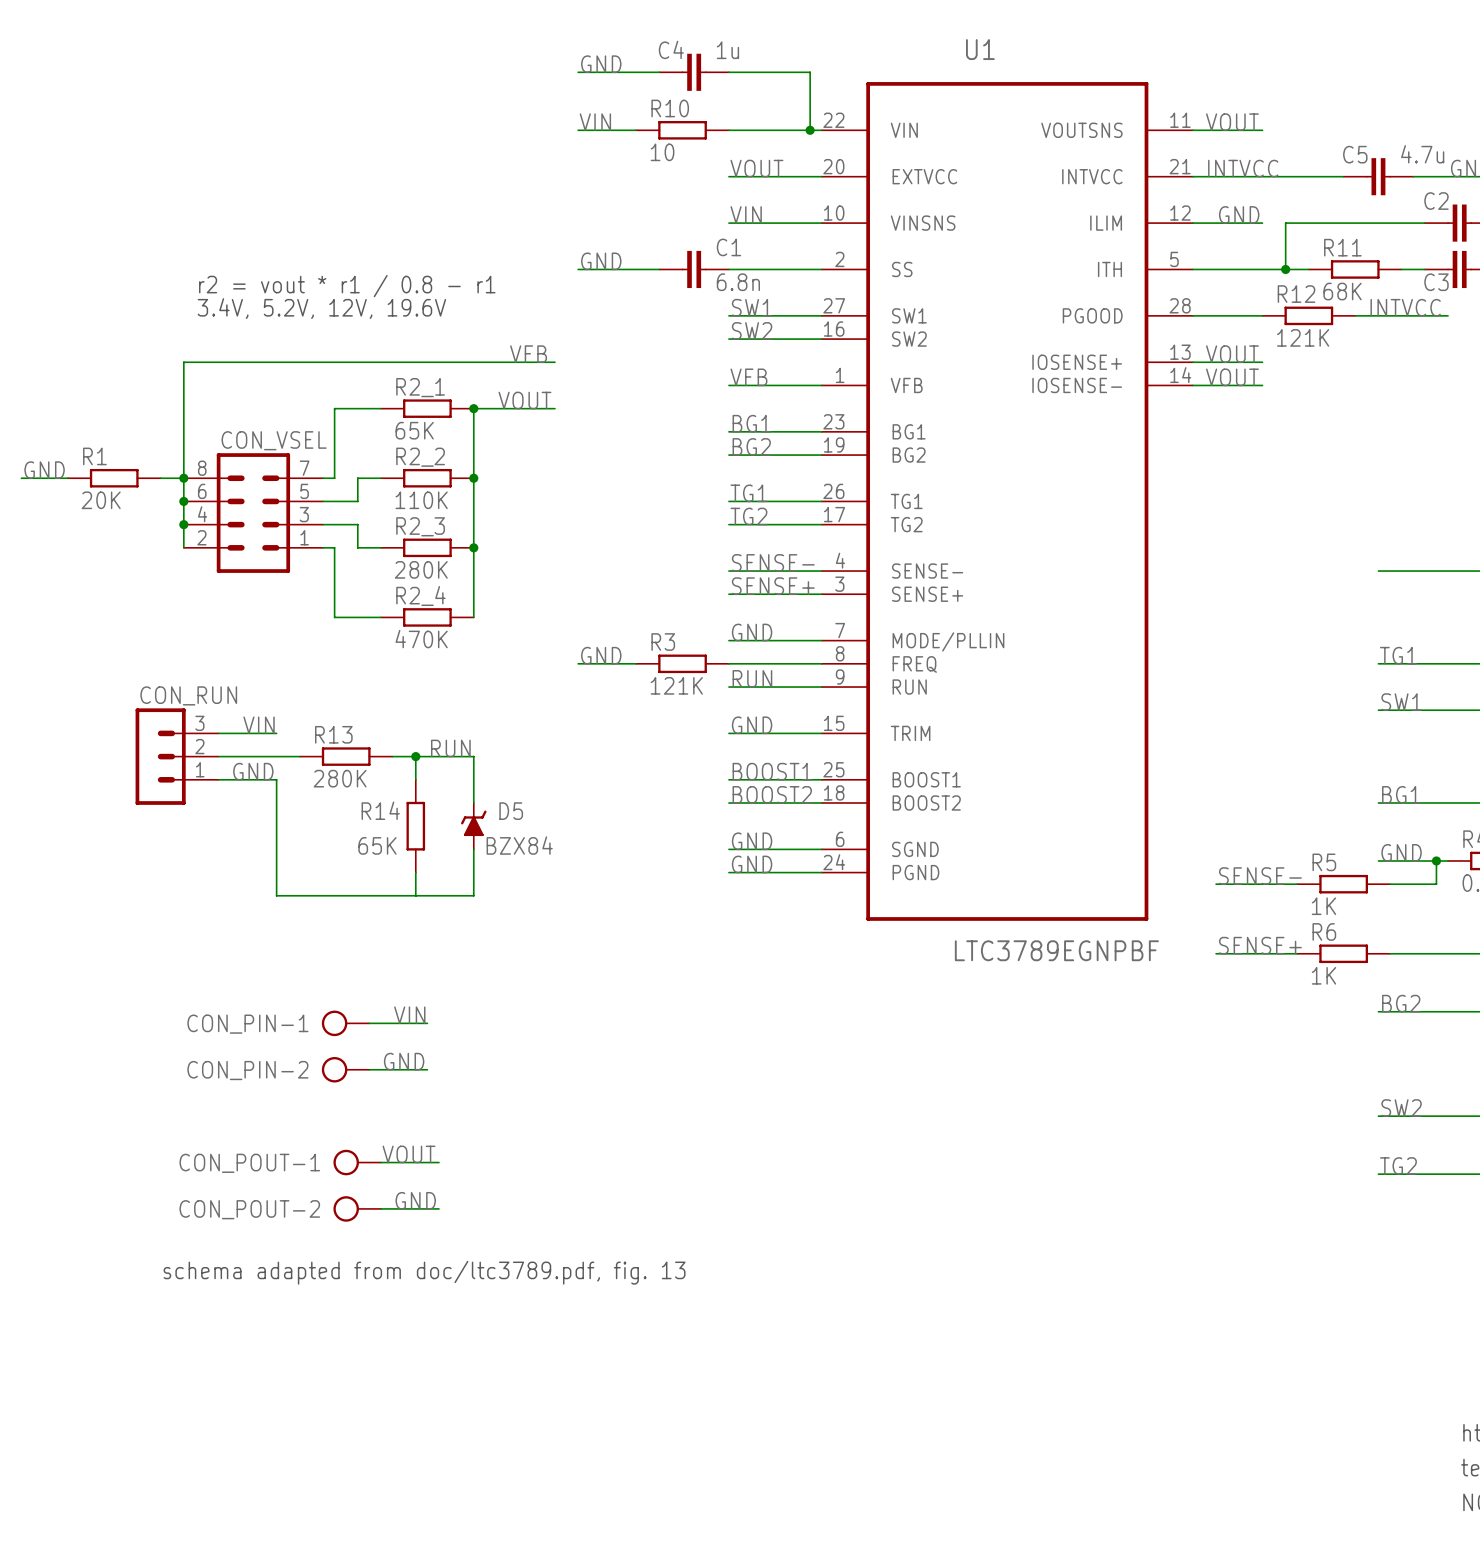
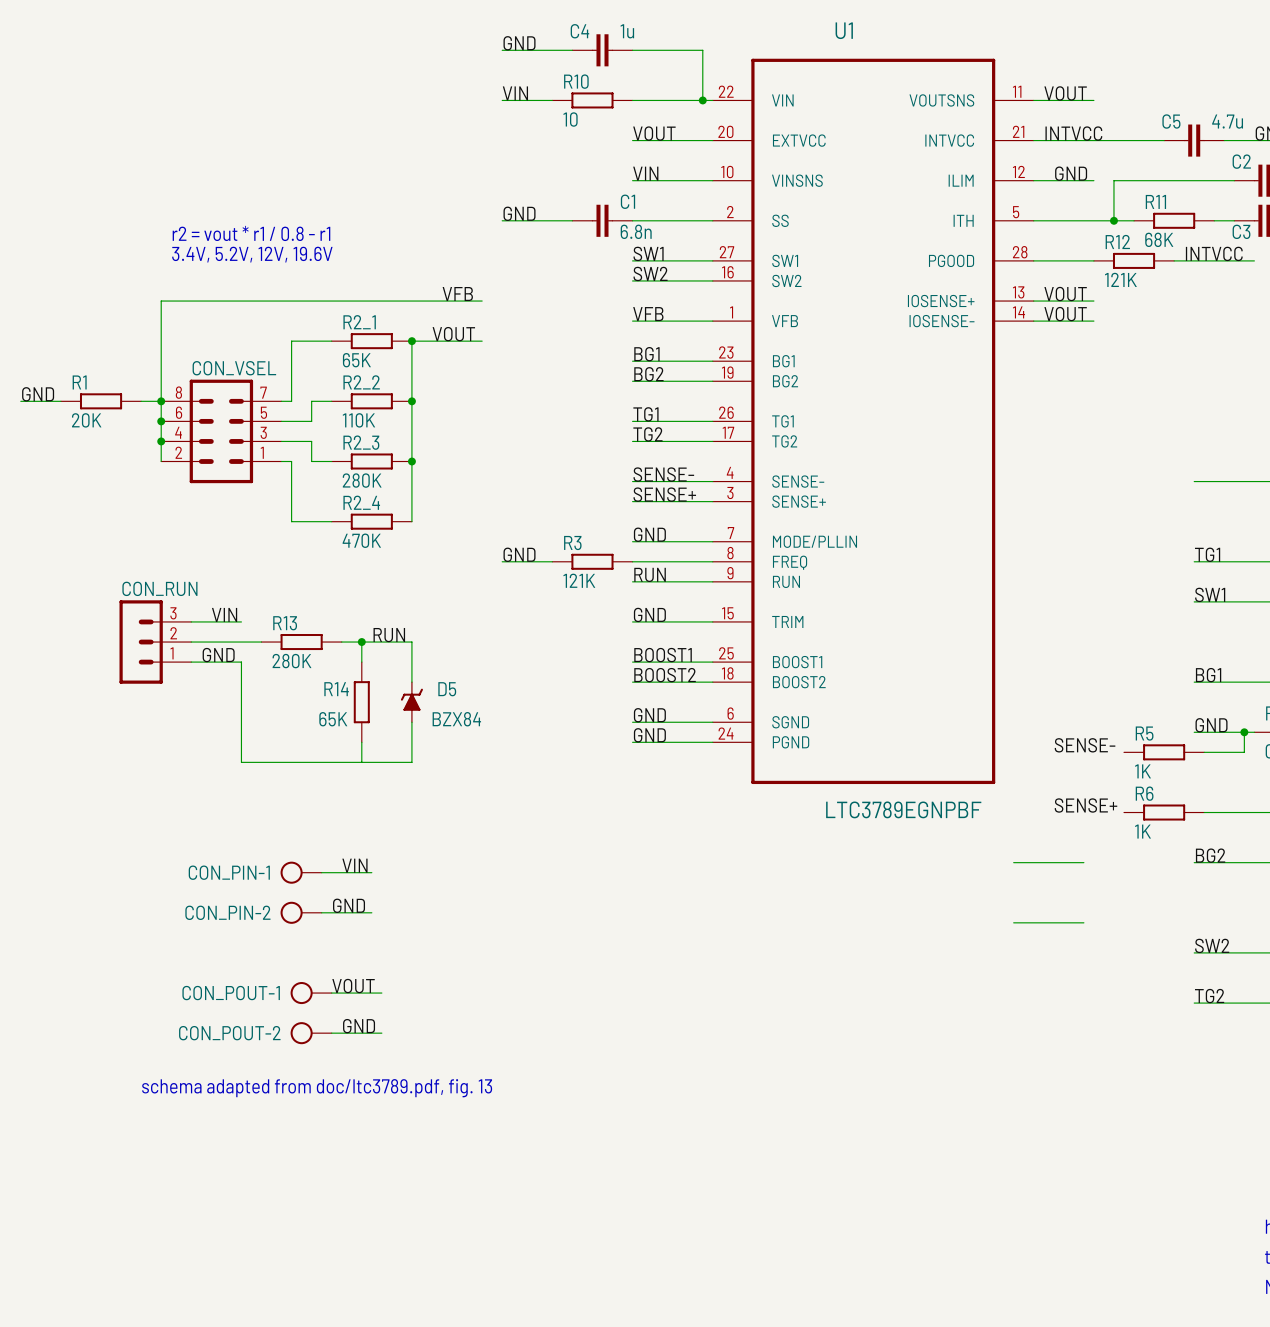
wire: (1216, 884) (1297, 884) -> (1013, 862) (1083, 862)
wire: (1216, 953) (1297, 953) -> (1013, 922) (1083, 922)

